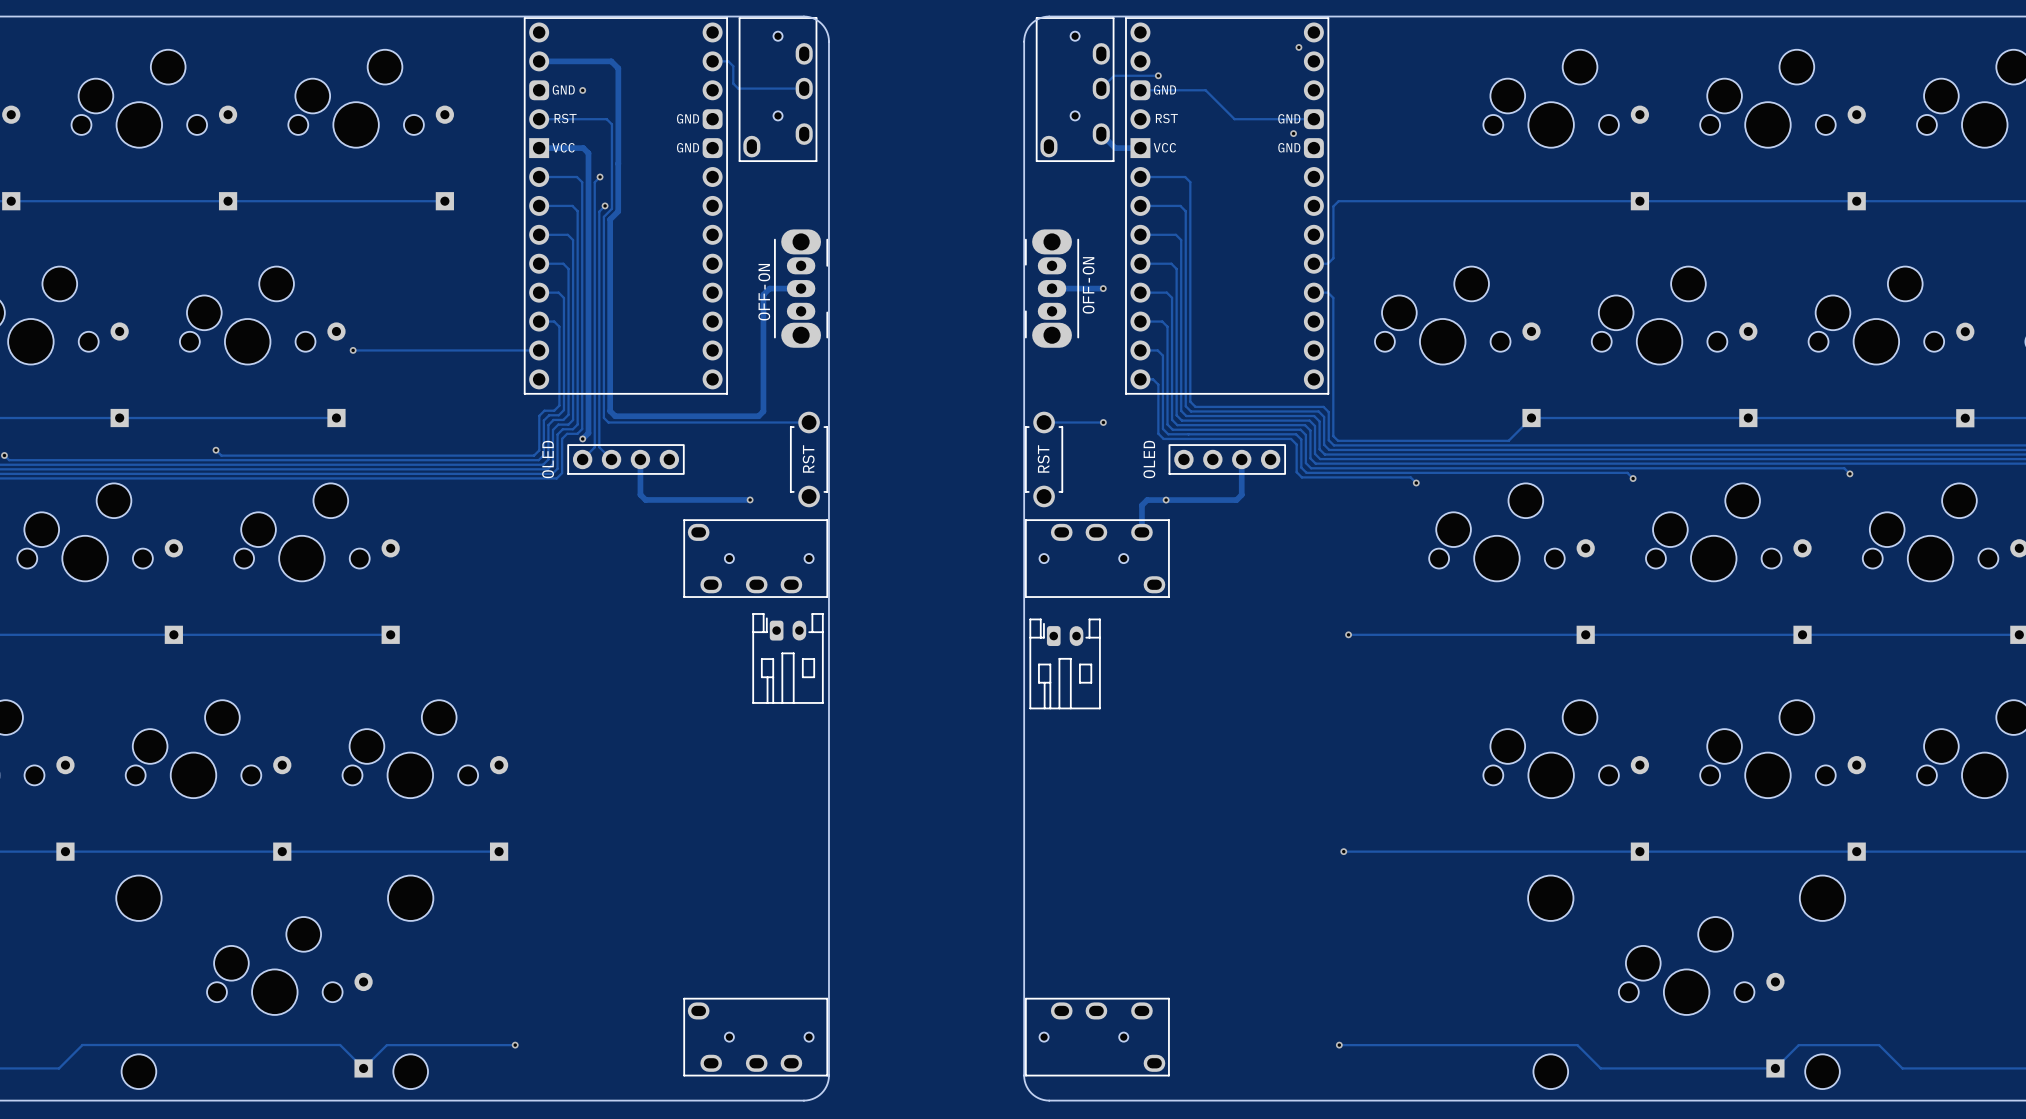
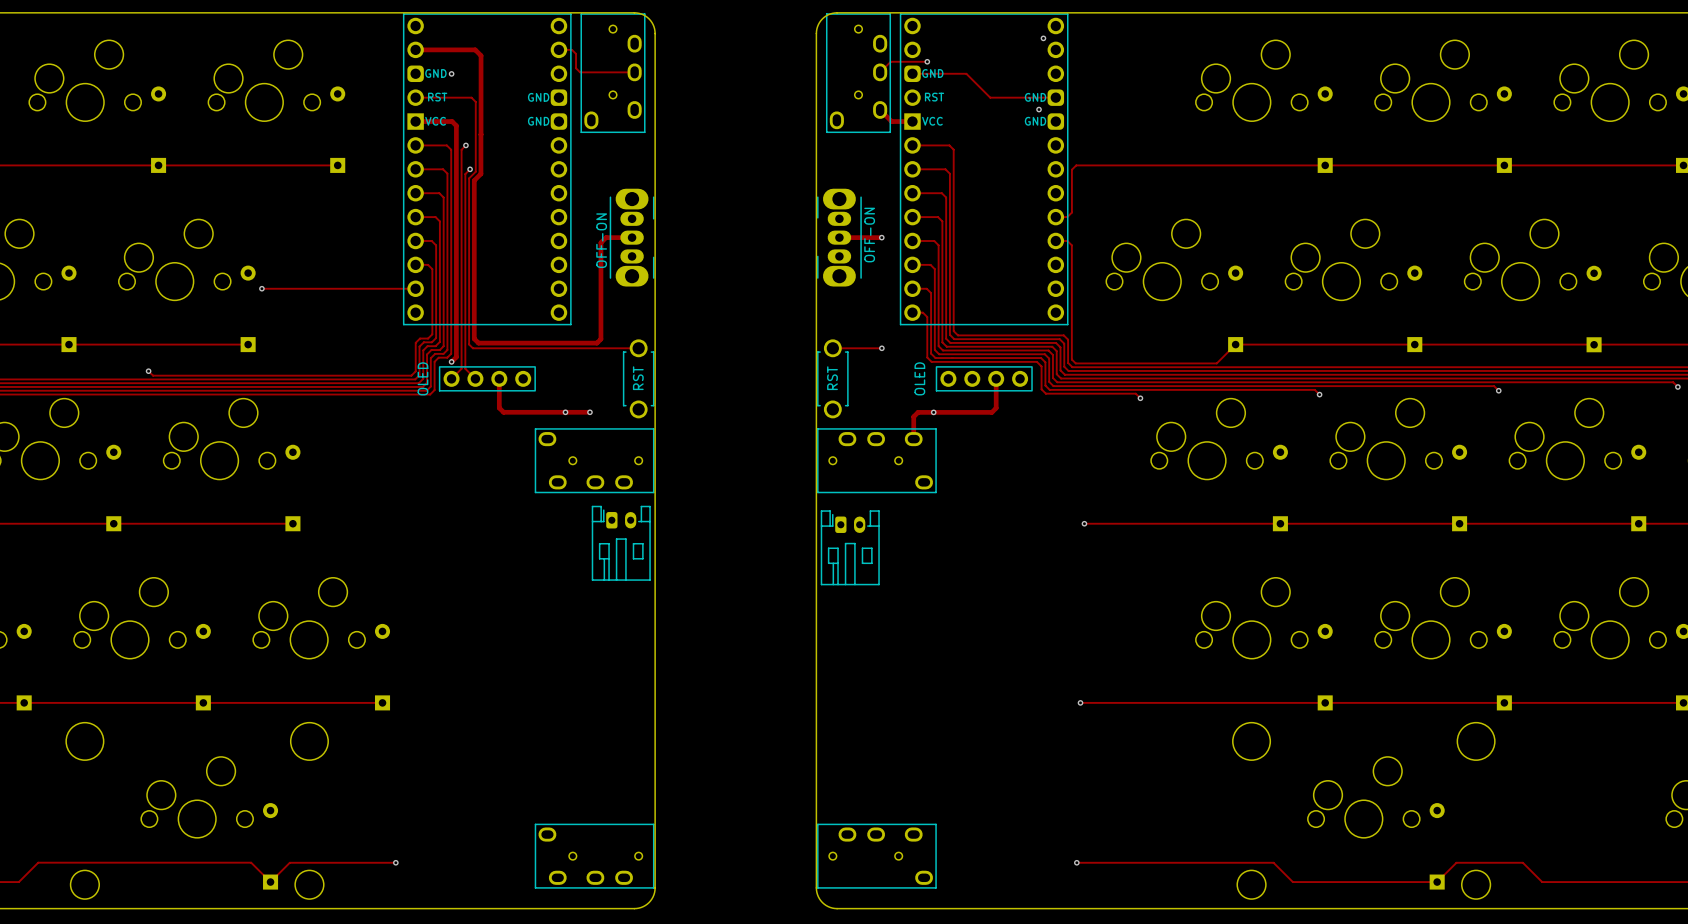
via: none -> (565, 412)

